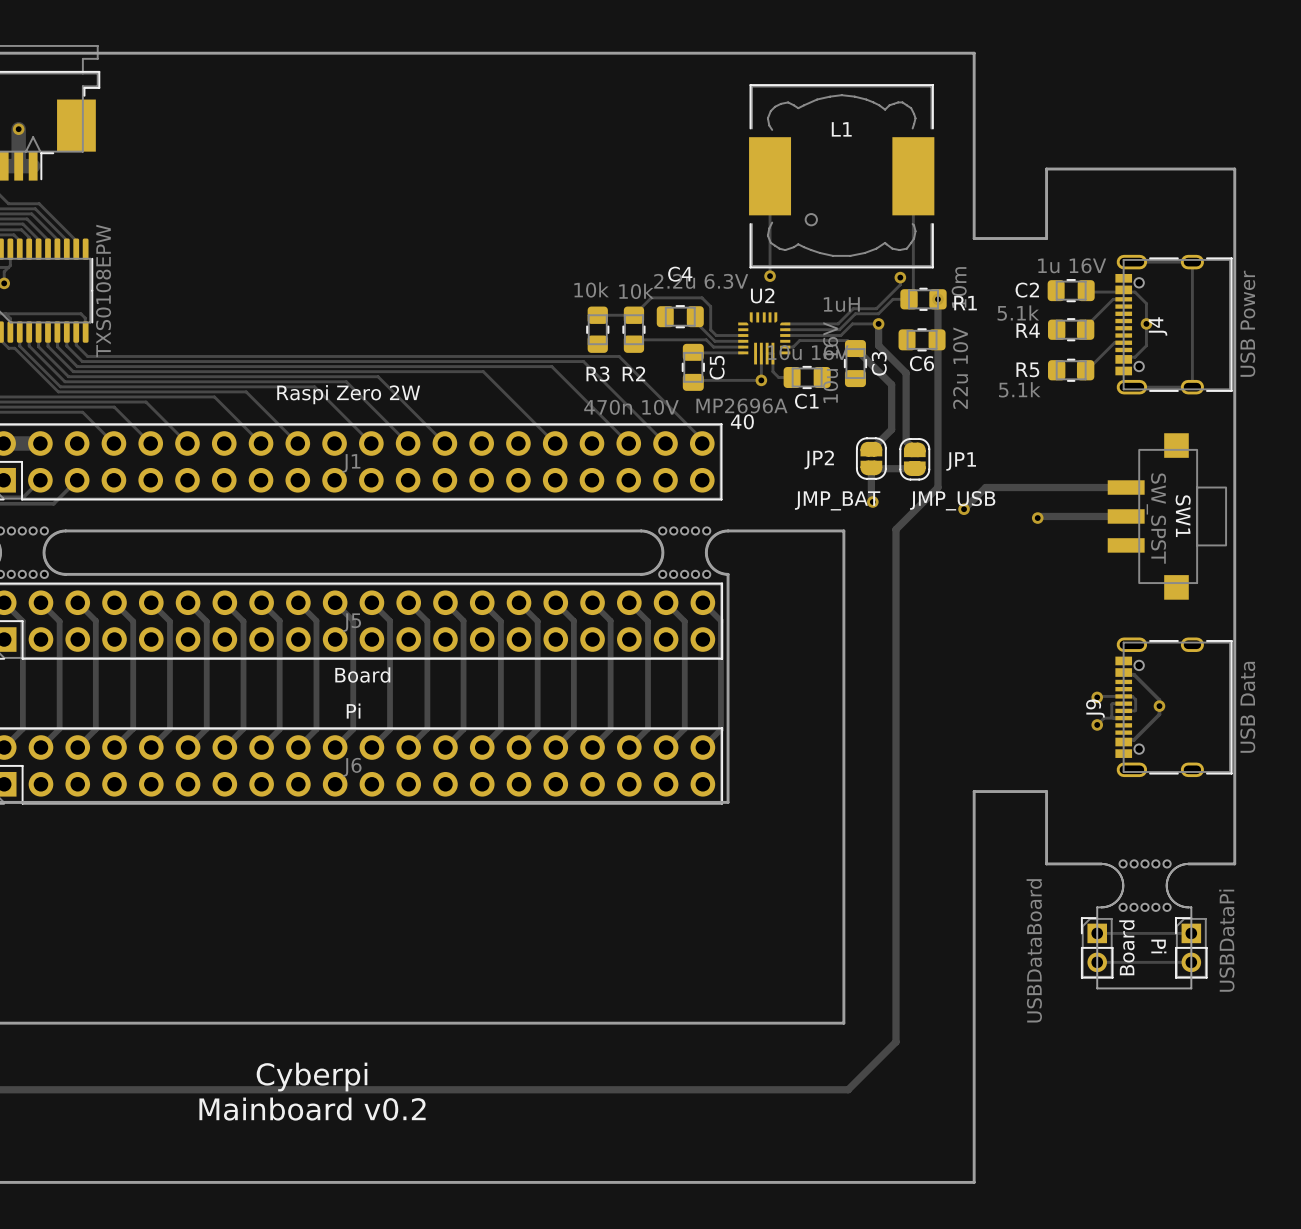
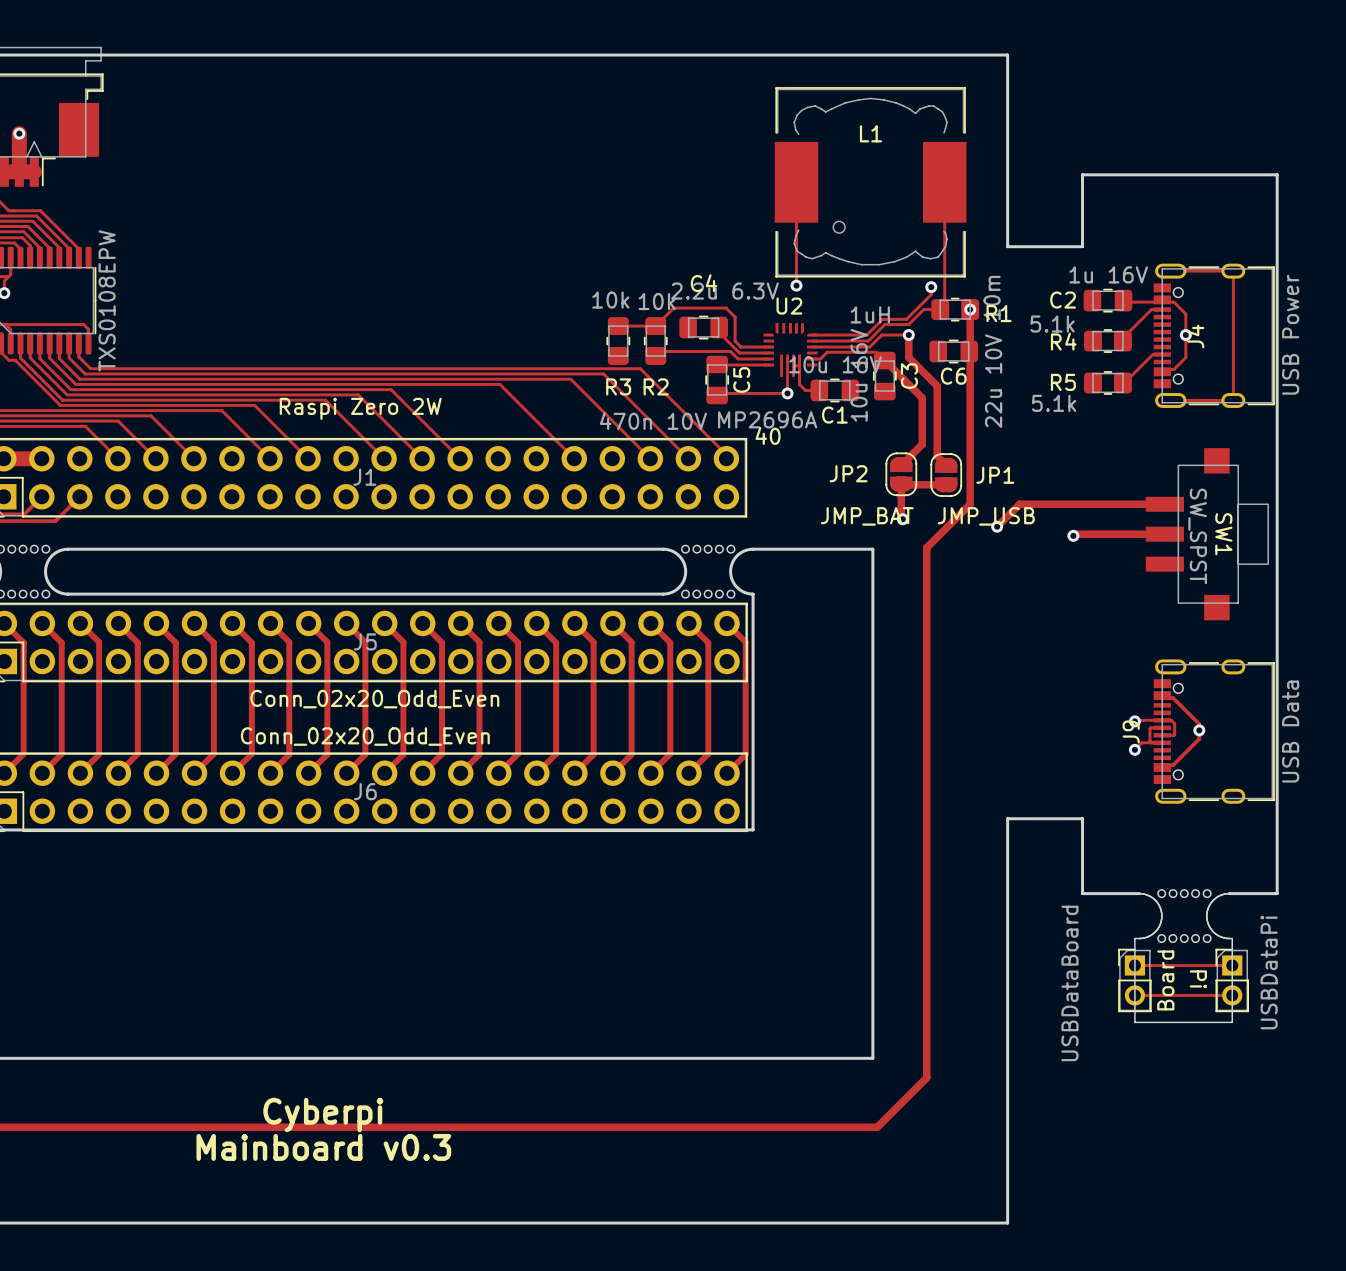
J5 value: Board (362, 675) -> Conn_02x20_Odd_Even (374, 699)
J6 value: Pi (353, 711) -> Conn_02x20_Odd_Even (365, 736)
text: Mainboard v0.2 (312, 1109) -> Mainboard v0.3 (323, 1147)

